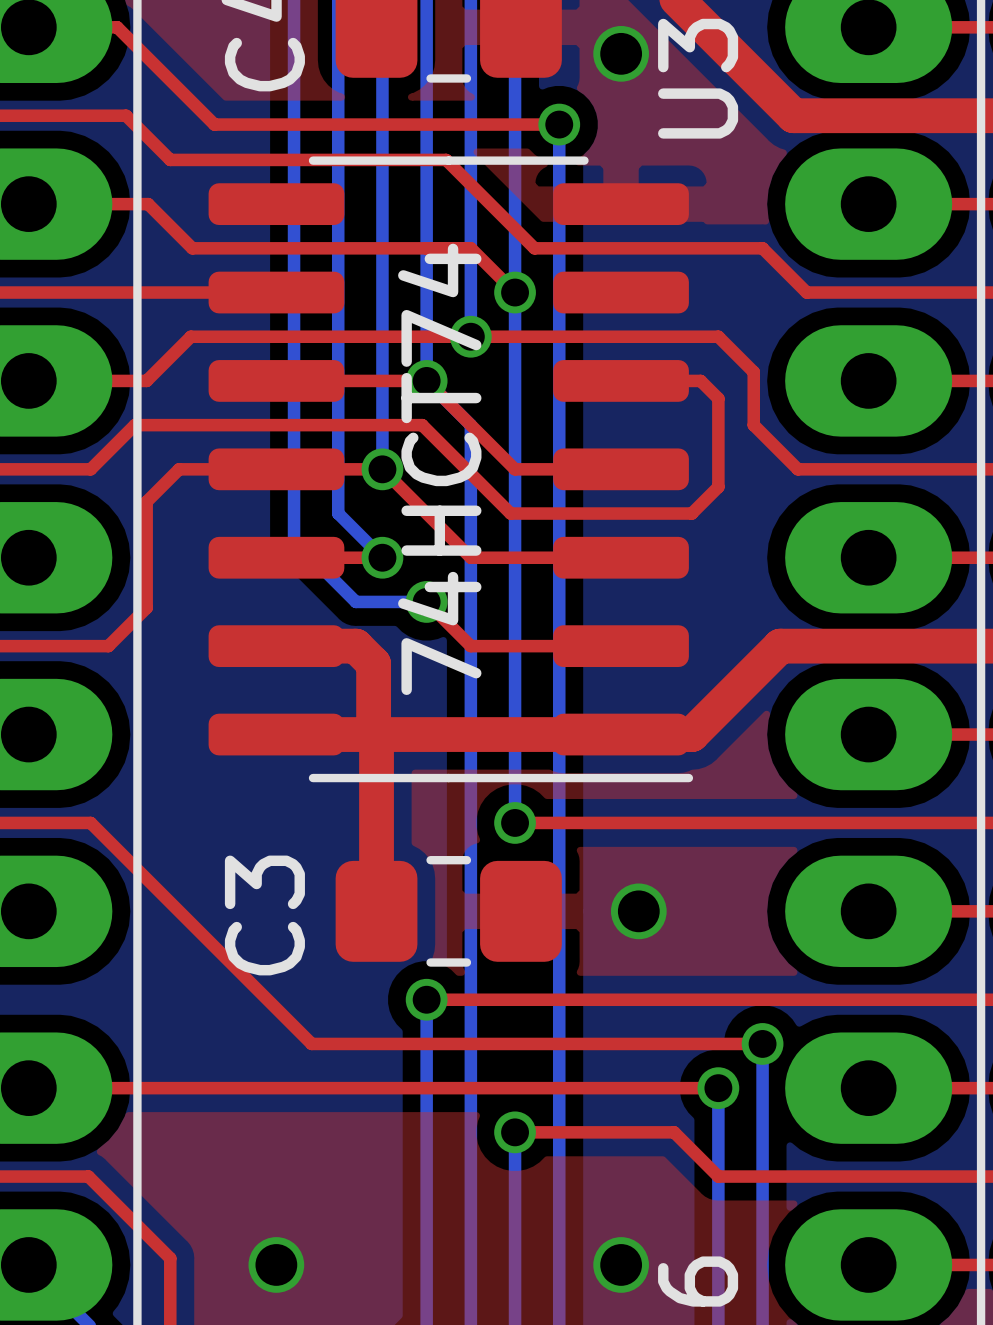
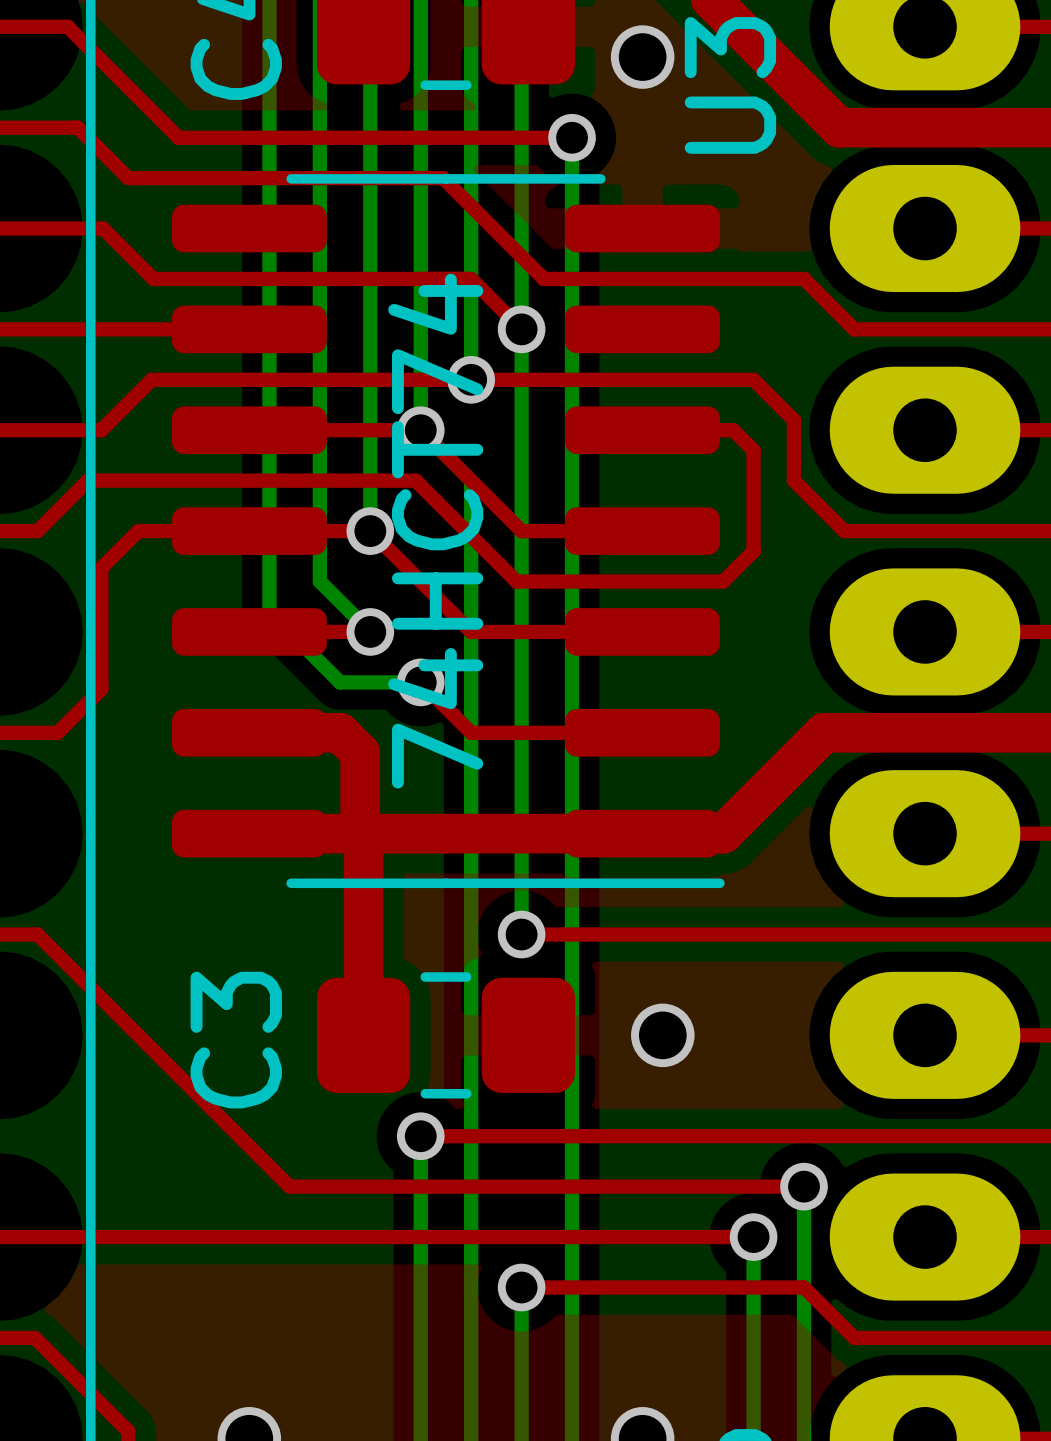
top track: (674, 1132) (718, 1176) (806, 1176) -> (703, 1287) (804, 1287) (854, 1337)

